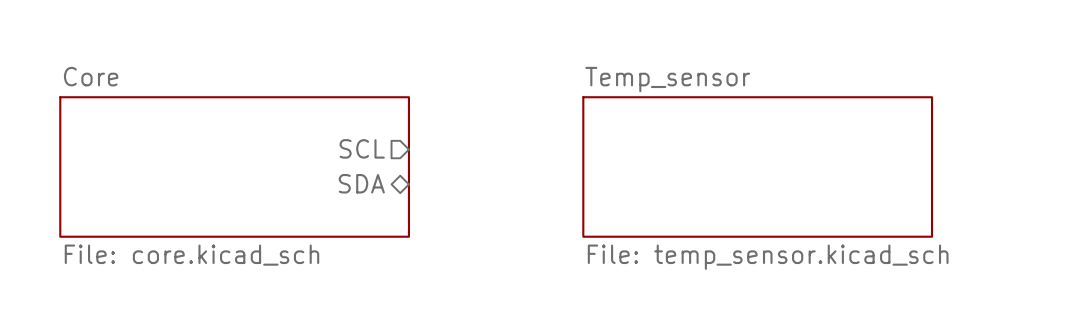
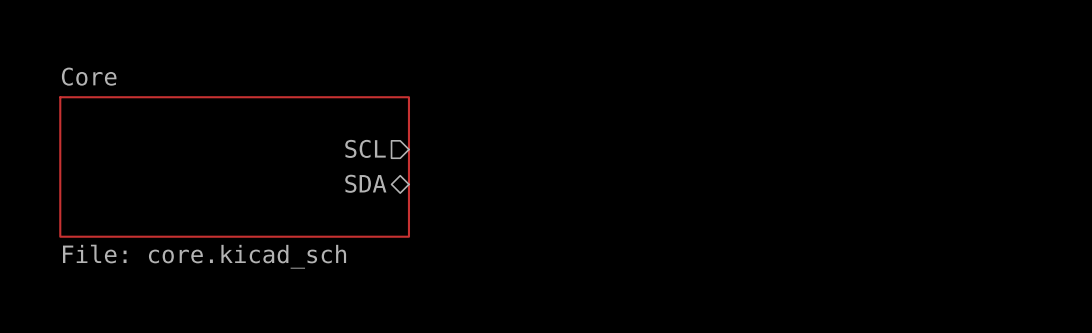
sheet Temp_sensor: File: temp_sensor.kicad_sch (757, 166) -> none

